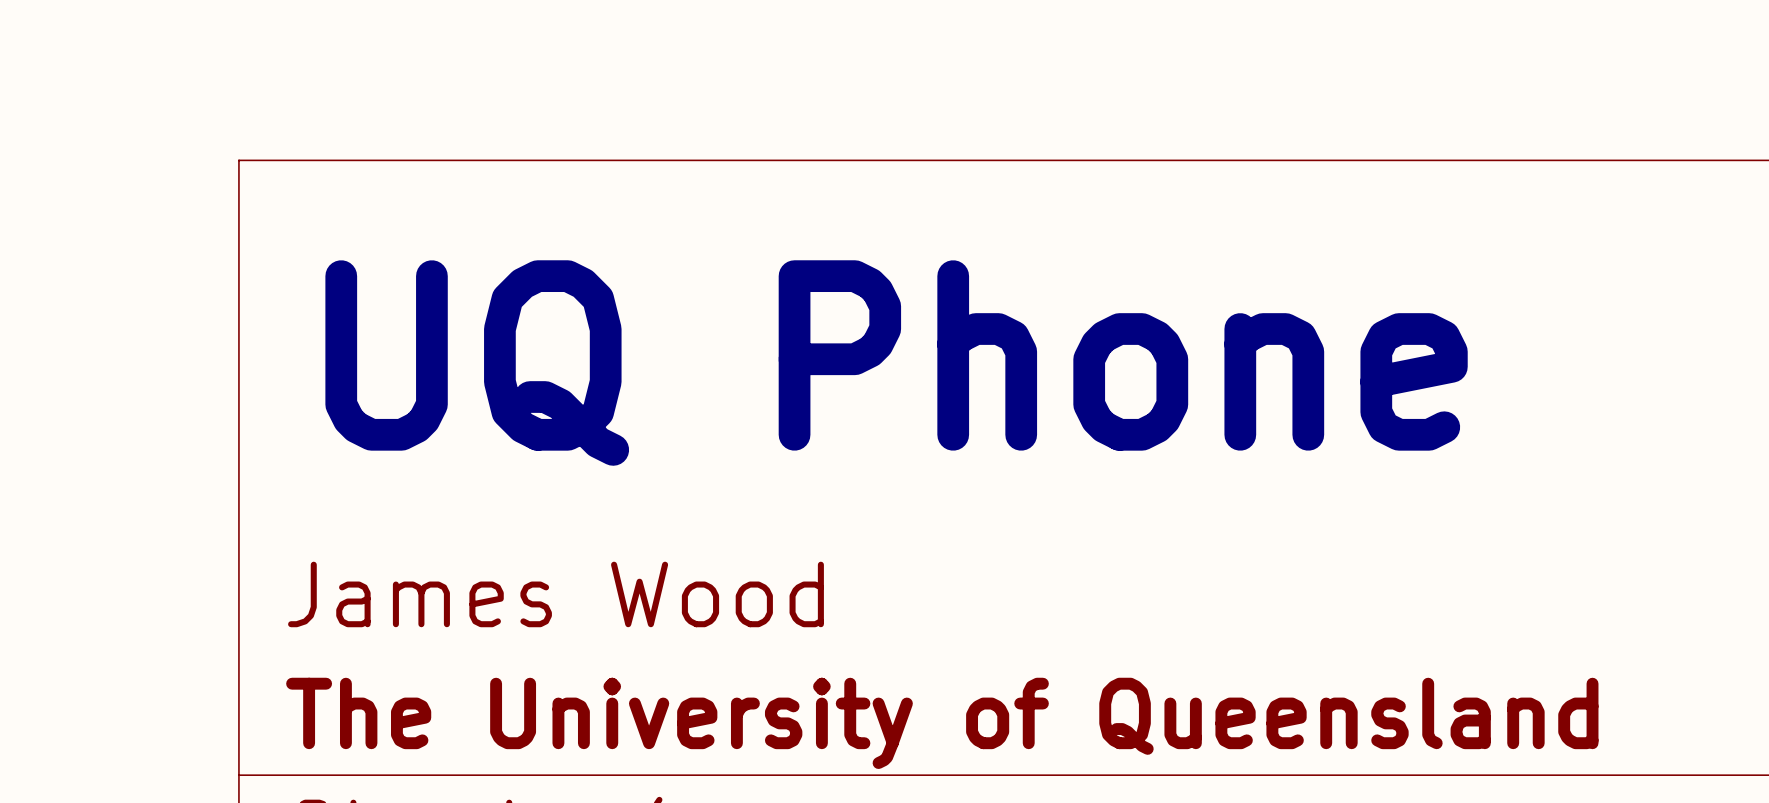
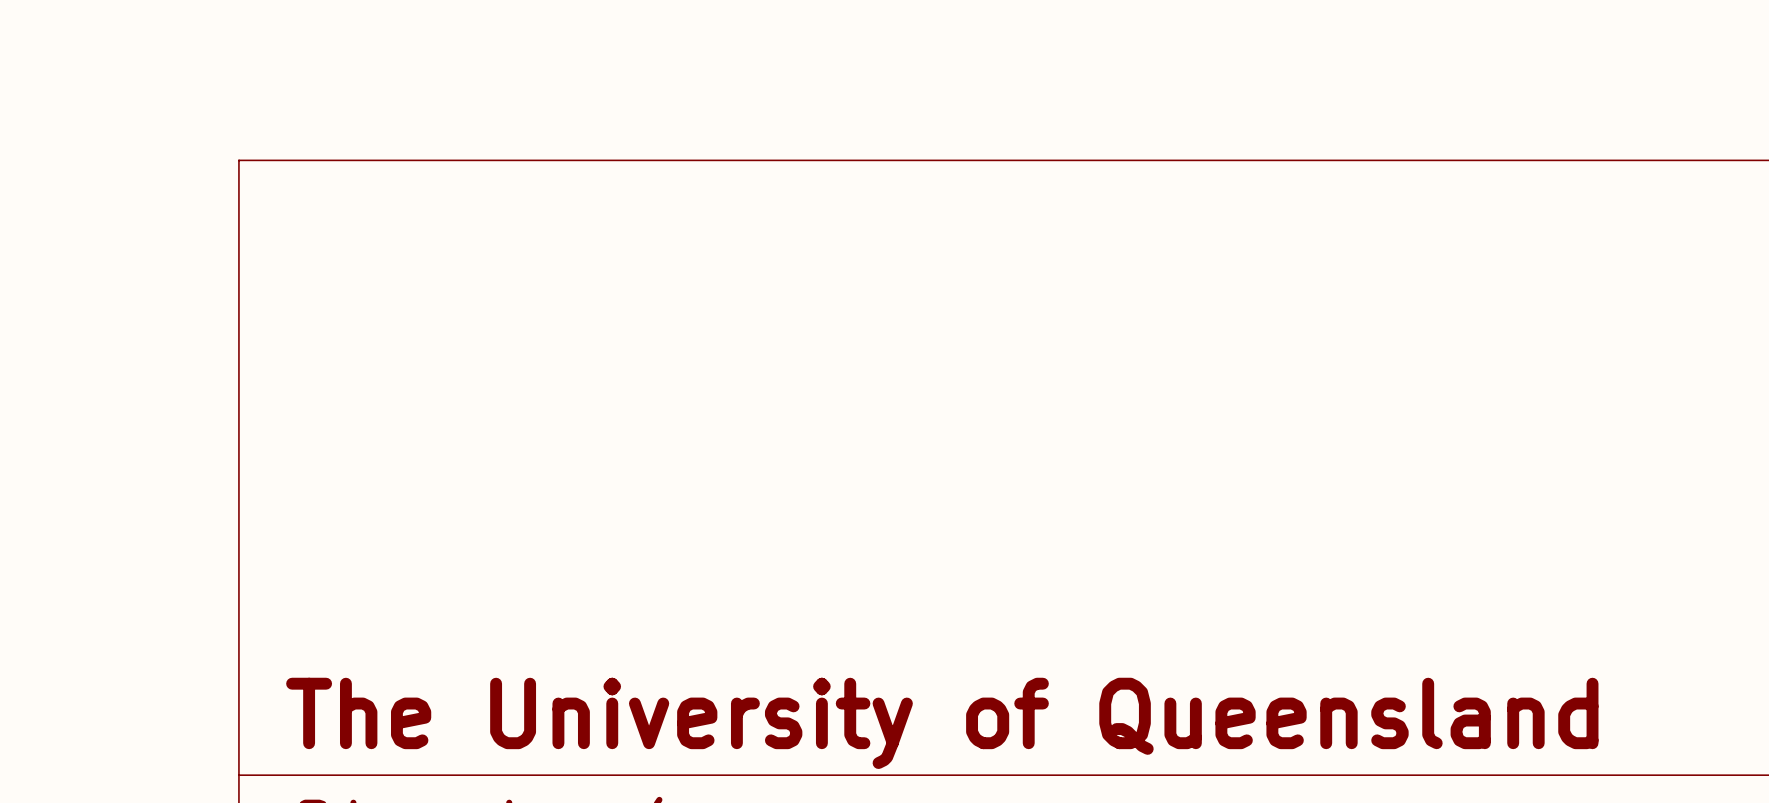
text: UQ Phone (896, 363) -> none
title block: James Wood (555, 594) -> none

